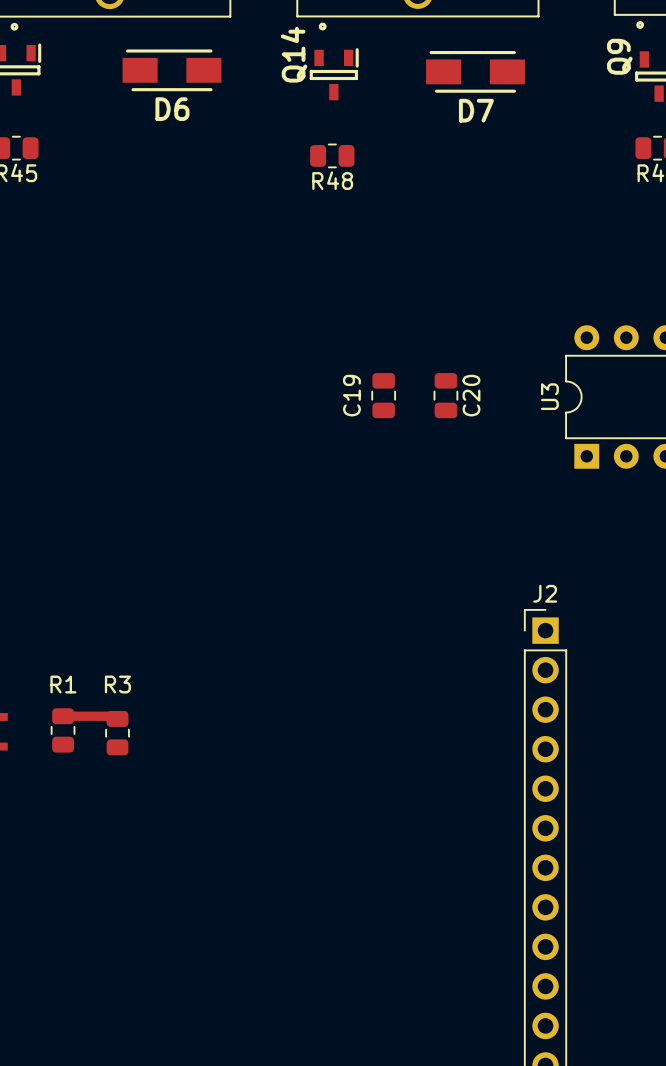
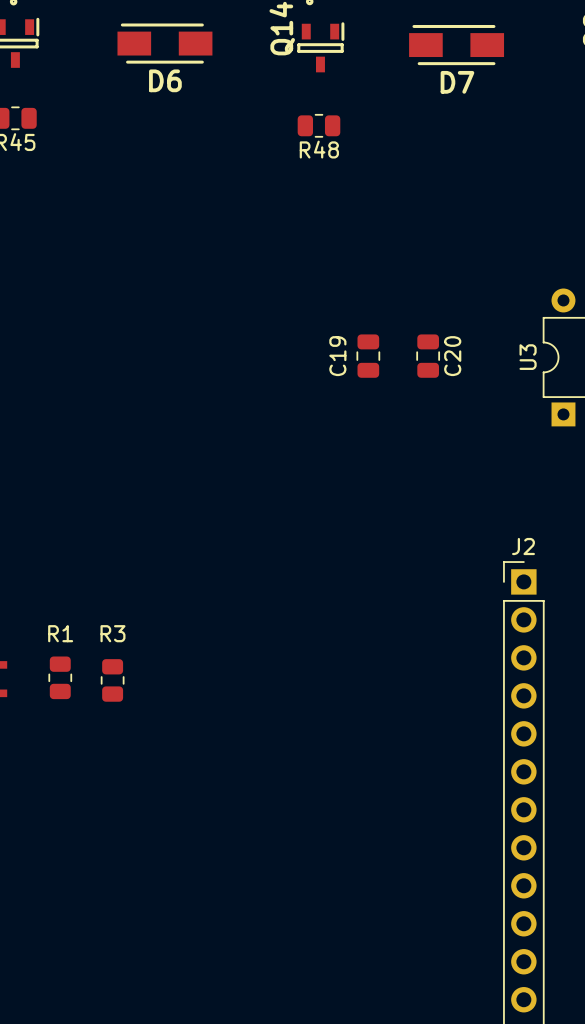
top track: (63, 716) (114, 716) (117, 718) -> none

